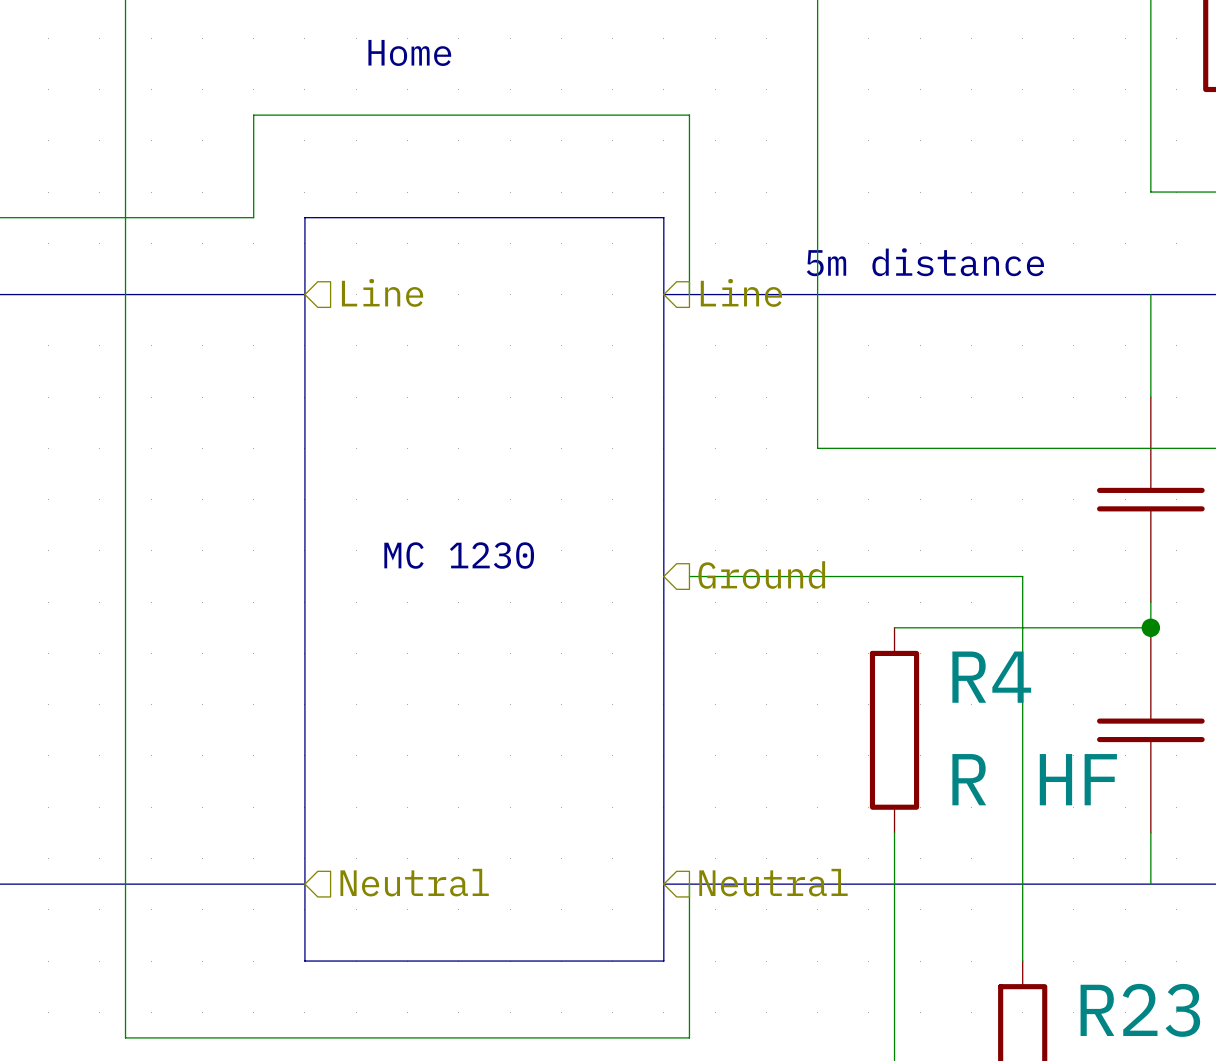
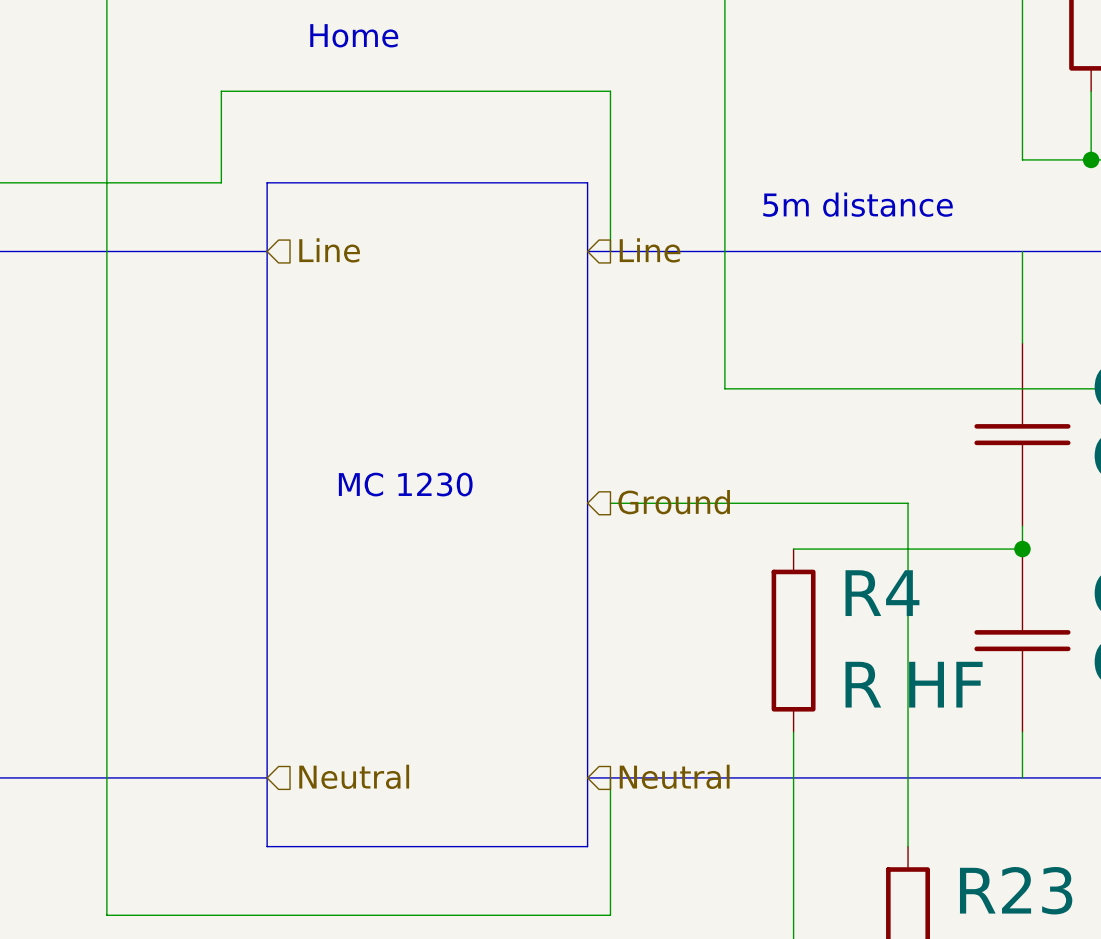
text position: 5m distance (925, 262) -> 5m distance (858, 204)

